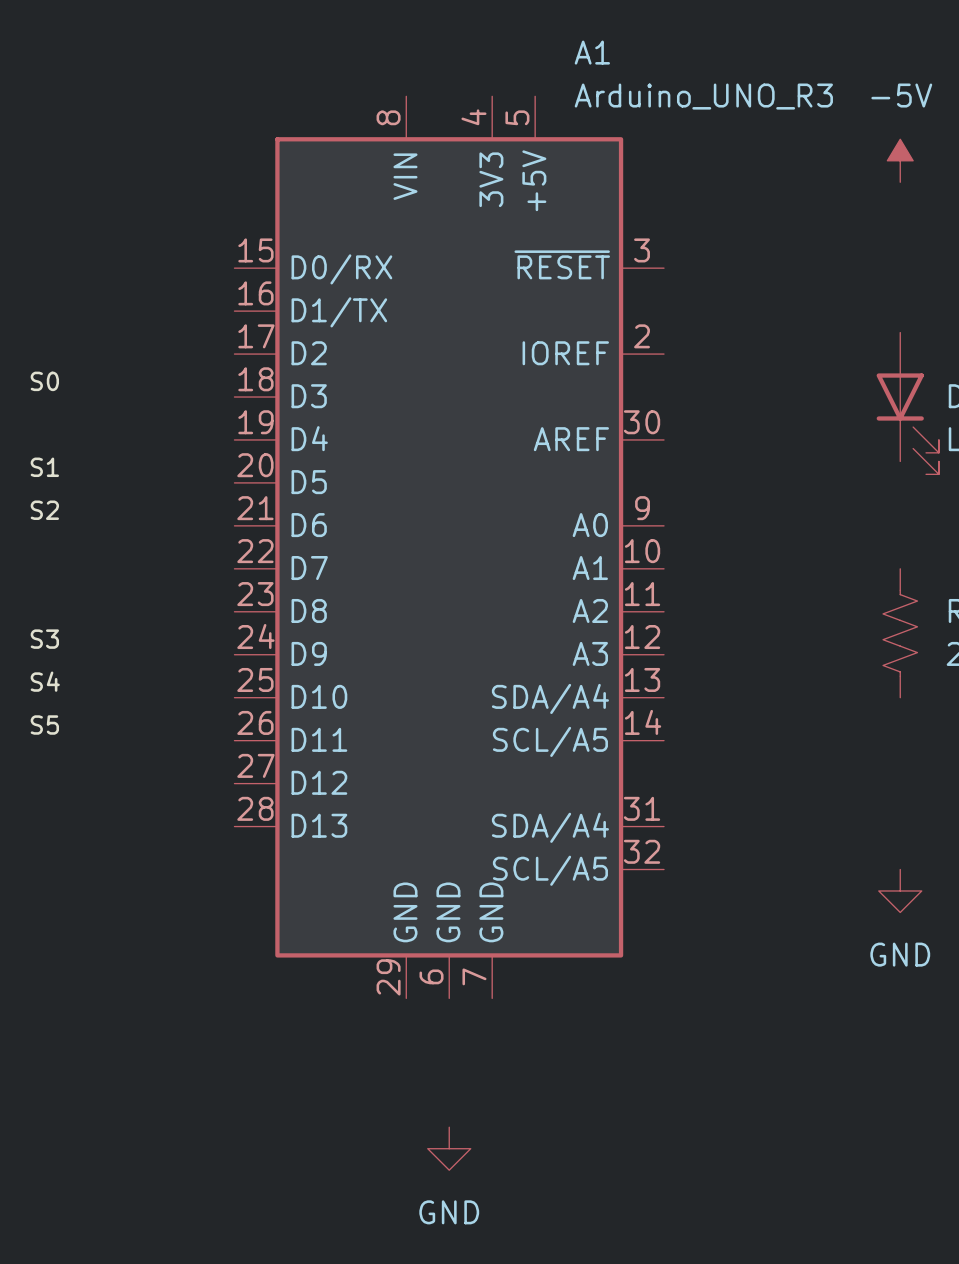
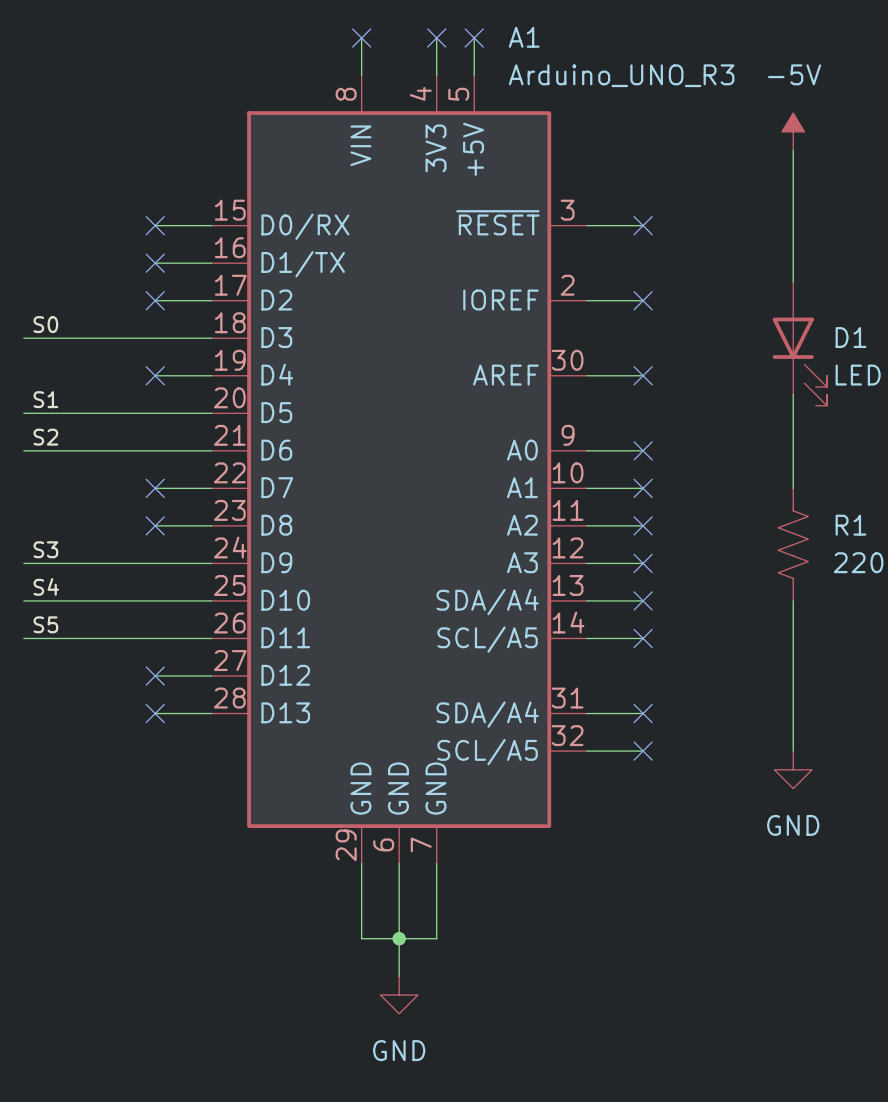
wire: none -> (361, 38) (361, 75)
no-connect mark: none -> (361, 38)
wire: none -> (436, 38) (436, 75)
no-connect mark: none -> (436, 38)
wire: none -> (474, 38) (474, 75)
no-connect mark: none -> (474, 38)
wire: none -> (793, 150) (793, 281)
wire: none -> (155, 225) (211, 225)
no-connect mark: none -> (155, 225)
wire: none -> (586, 225) (643, 225)
no-connect mark: none -> (643, 225)
wire: none -> (155, 263) (211, 263)
no-connect mark: none -> (155, 263)
wire: none -> (155, 300) (211, 300)
no-connect mark: none -> (155, 300)
wire: none -> (586, 300) (643, 300)
no-connect mark: none -> (643, 300)
wire: none -> (23, 338) (211, 338)
wire: none -> (155, 375) (211, 375)
no-connect mark: none -> (155, 375)
wire: none -> (586, 375) (643, 375)
no-connect mark: none -> (643, 375)
wire: none -> (793, 394) (793, 488)
wire: none -> (23, 413) (211, 413)
wire: none -> (23, 450) (211, 450)
wire: none -> (586, 450) (643, 450)
no-connect mark: none -> (643, 450)
wire: none -> (155, 488) (211, 488)
no-connect mark: none -> (155, 488)
wire: none -> (586, 488) (643, 488)
no-connect mark: none -> (643, 488)
wire: none -> (155, 525) (211, 525)
no-connect mark: none -> (155, 525)
wire: none -> (586, 525) (643, 525)
no-connect mark: none -> (643, 525)
wire: none -> (23, 563) (211, 563)
wire: none -> (586, 563) (643, 563)
no-connect mark: none -> (643, 563)
wire: none -> (23, 600) (211, 600)
wire: none -> (586, 600) (643, 600)
no-connect mark: none -> (643, 600)
wire: none -> (793, 600) (793, 751)
wire: none -> (23, 638) (211, 638)
wire: none -> (586, 638) (643, 638)
no-connect mark: none -> (643, 638)
wire: none -> (155, 676) (211, 676)
no-connect mark: none -> (155, 676)
wire: none -> (155, 713) (211, 713)
no-connect mark: none -> (155, 713)
wire: none -> (586, 713) (643, 713)
no-connect mark: none -> (643, 713)
wire: none -> (586, 751) (643, 751)
no-connect mark: none -> (643, 751)
wire: none -> (361, 863) (361, 938) (436, 938) (436, 863)
wire: none -> (399, 863) (399, 976)
junction: none -> (399, 938)

